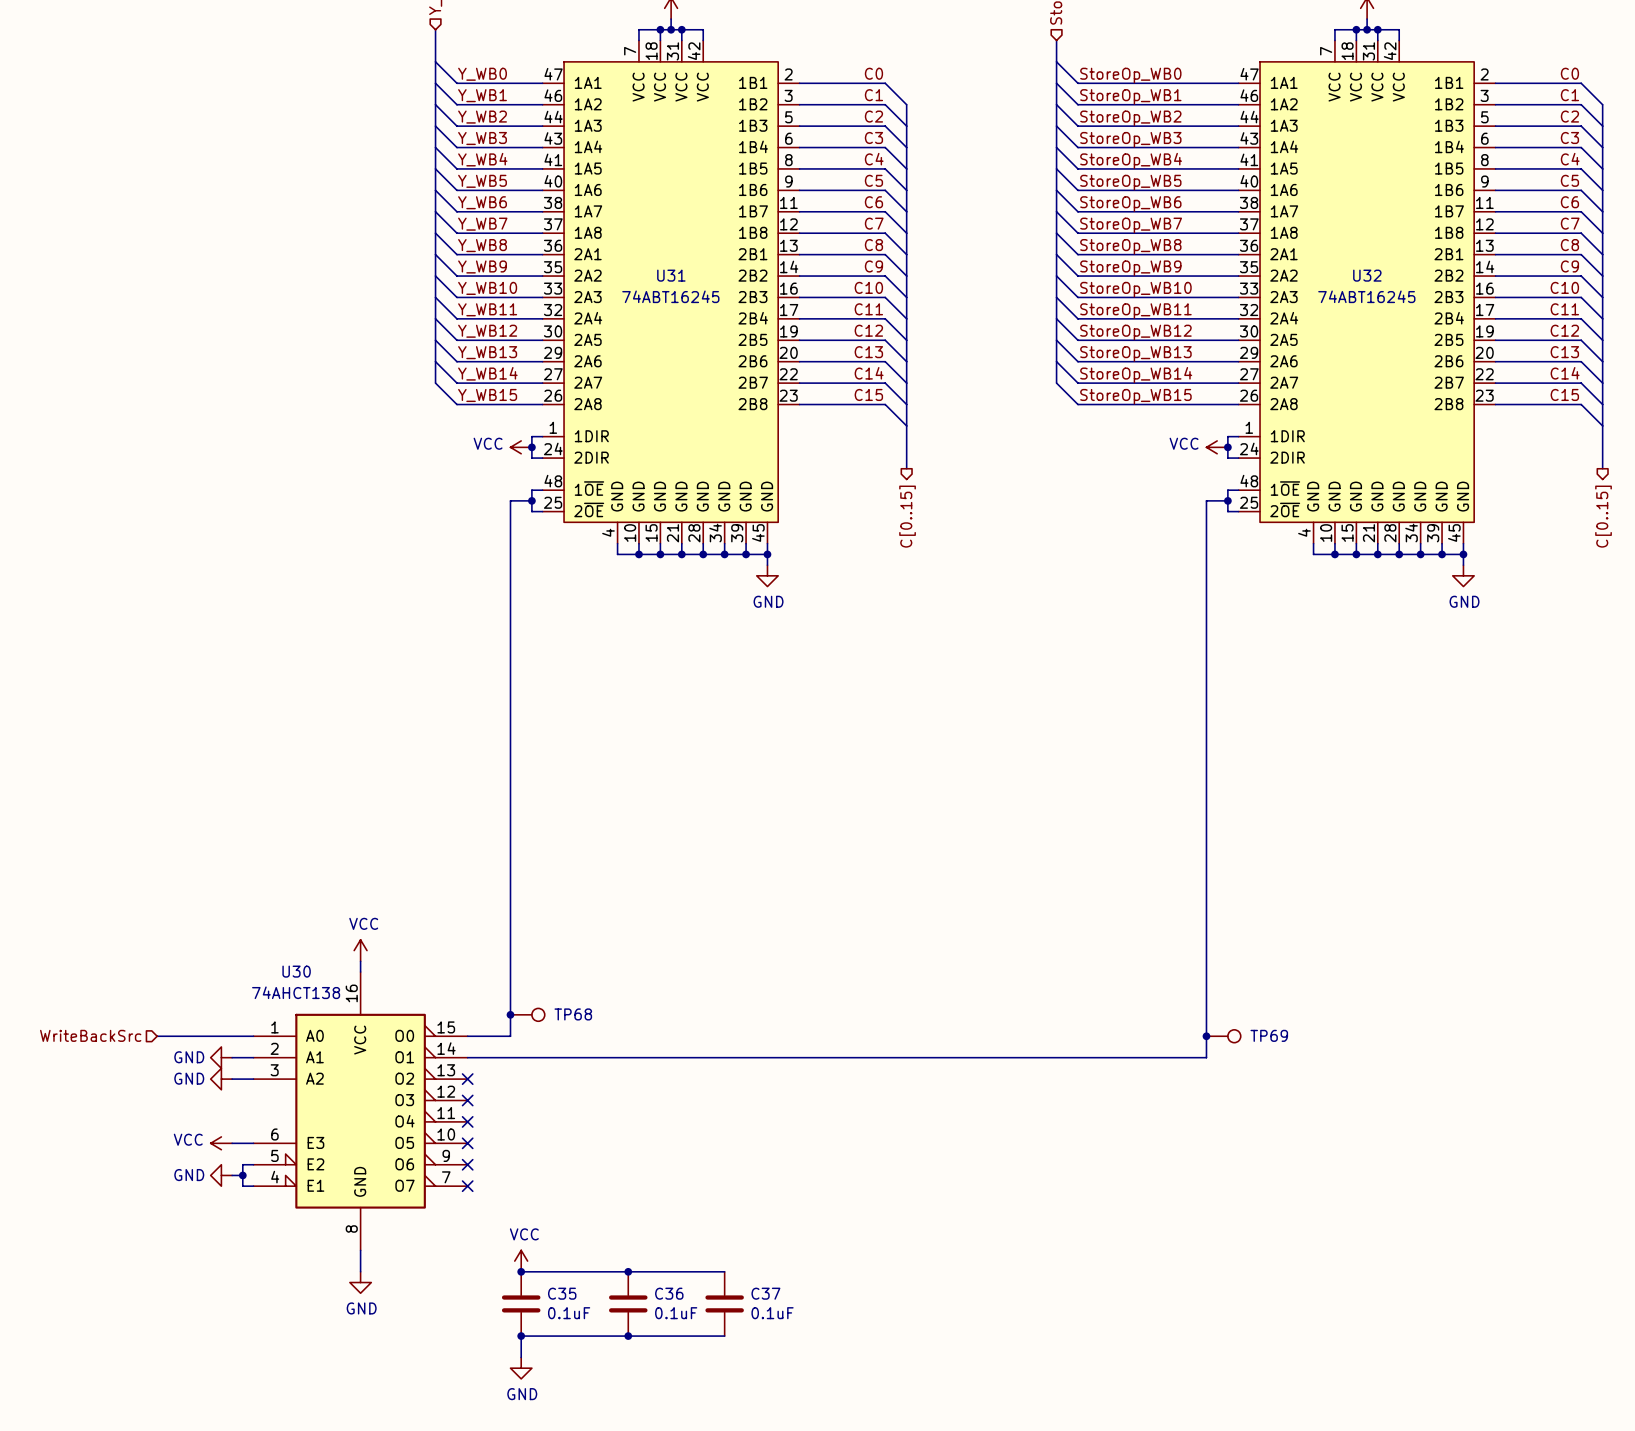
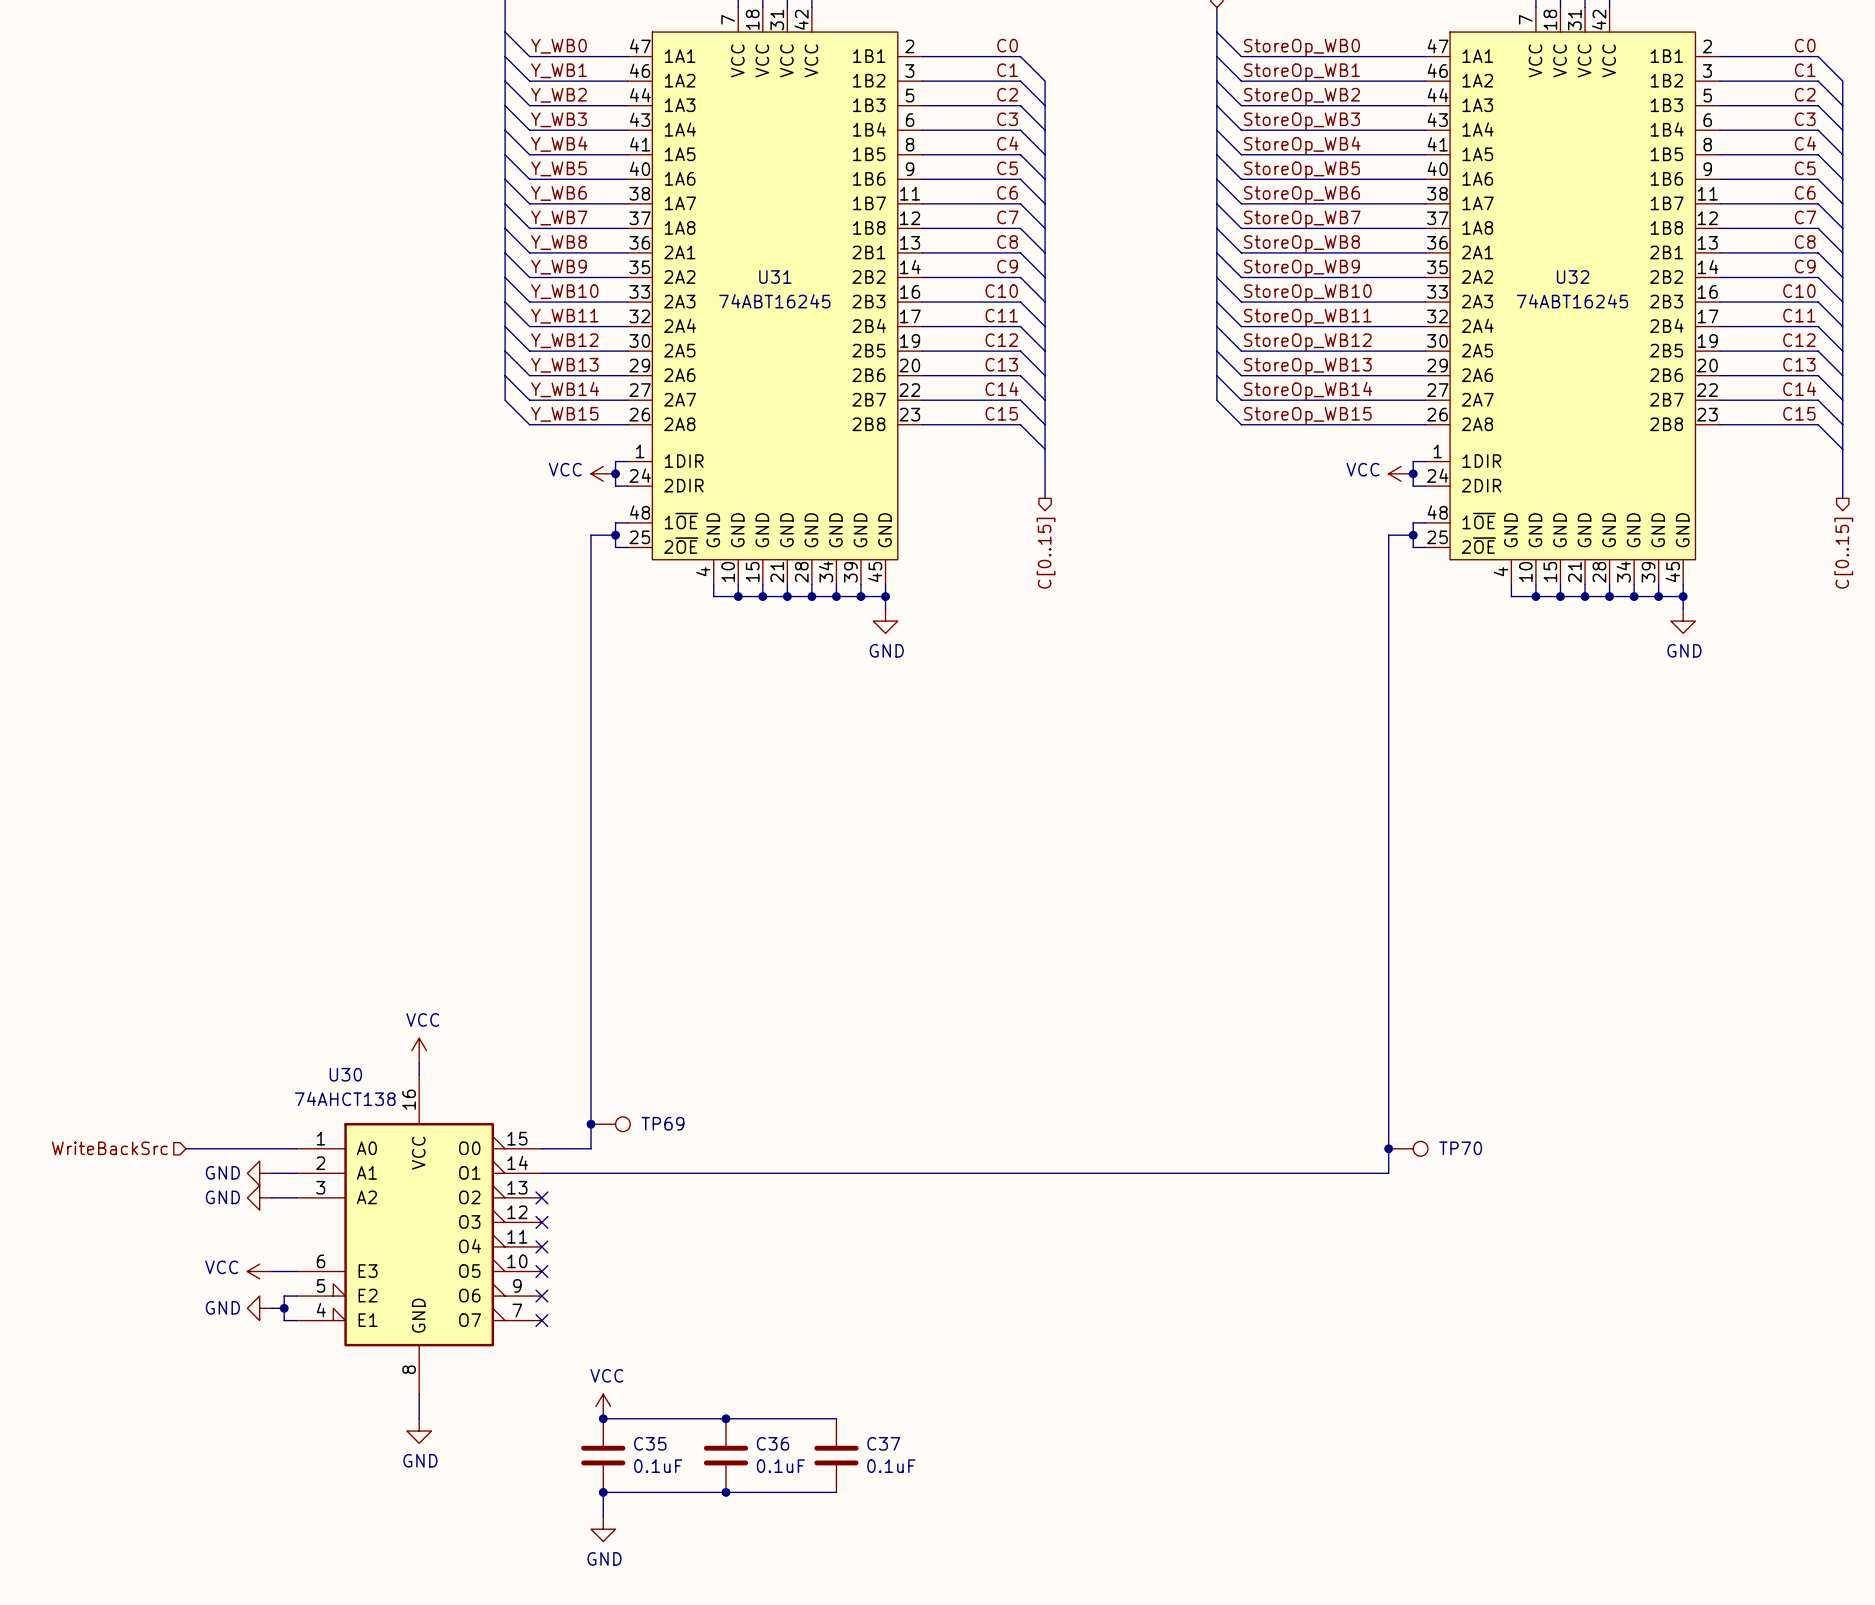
TP68 name: TP68 (573, 1014) -> TP69 (662, 1123)
TP69 name: TP69 (1269, 1035) -> TP70 (1460, 1148)

